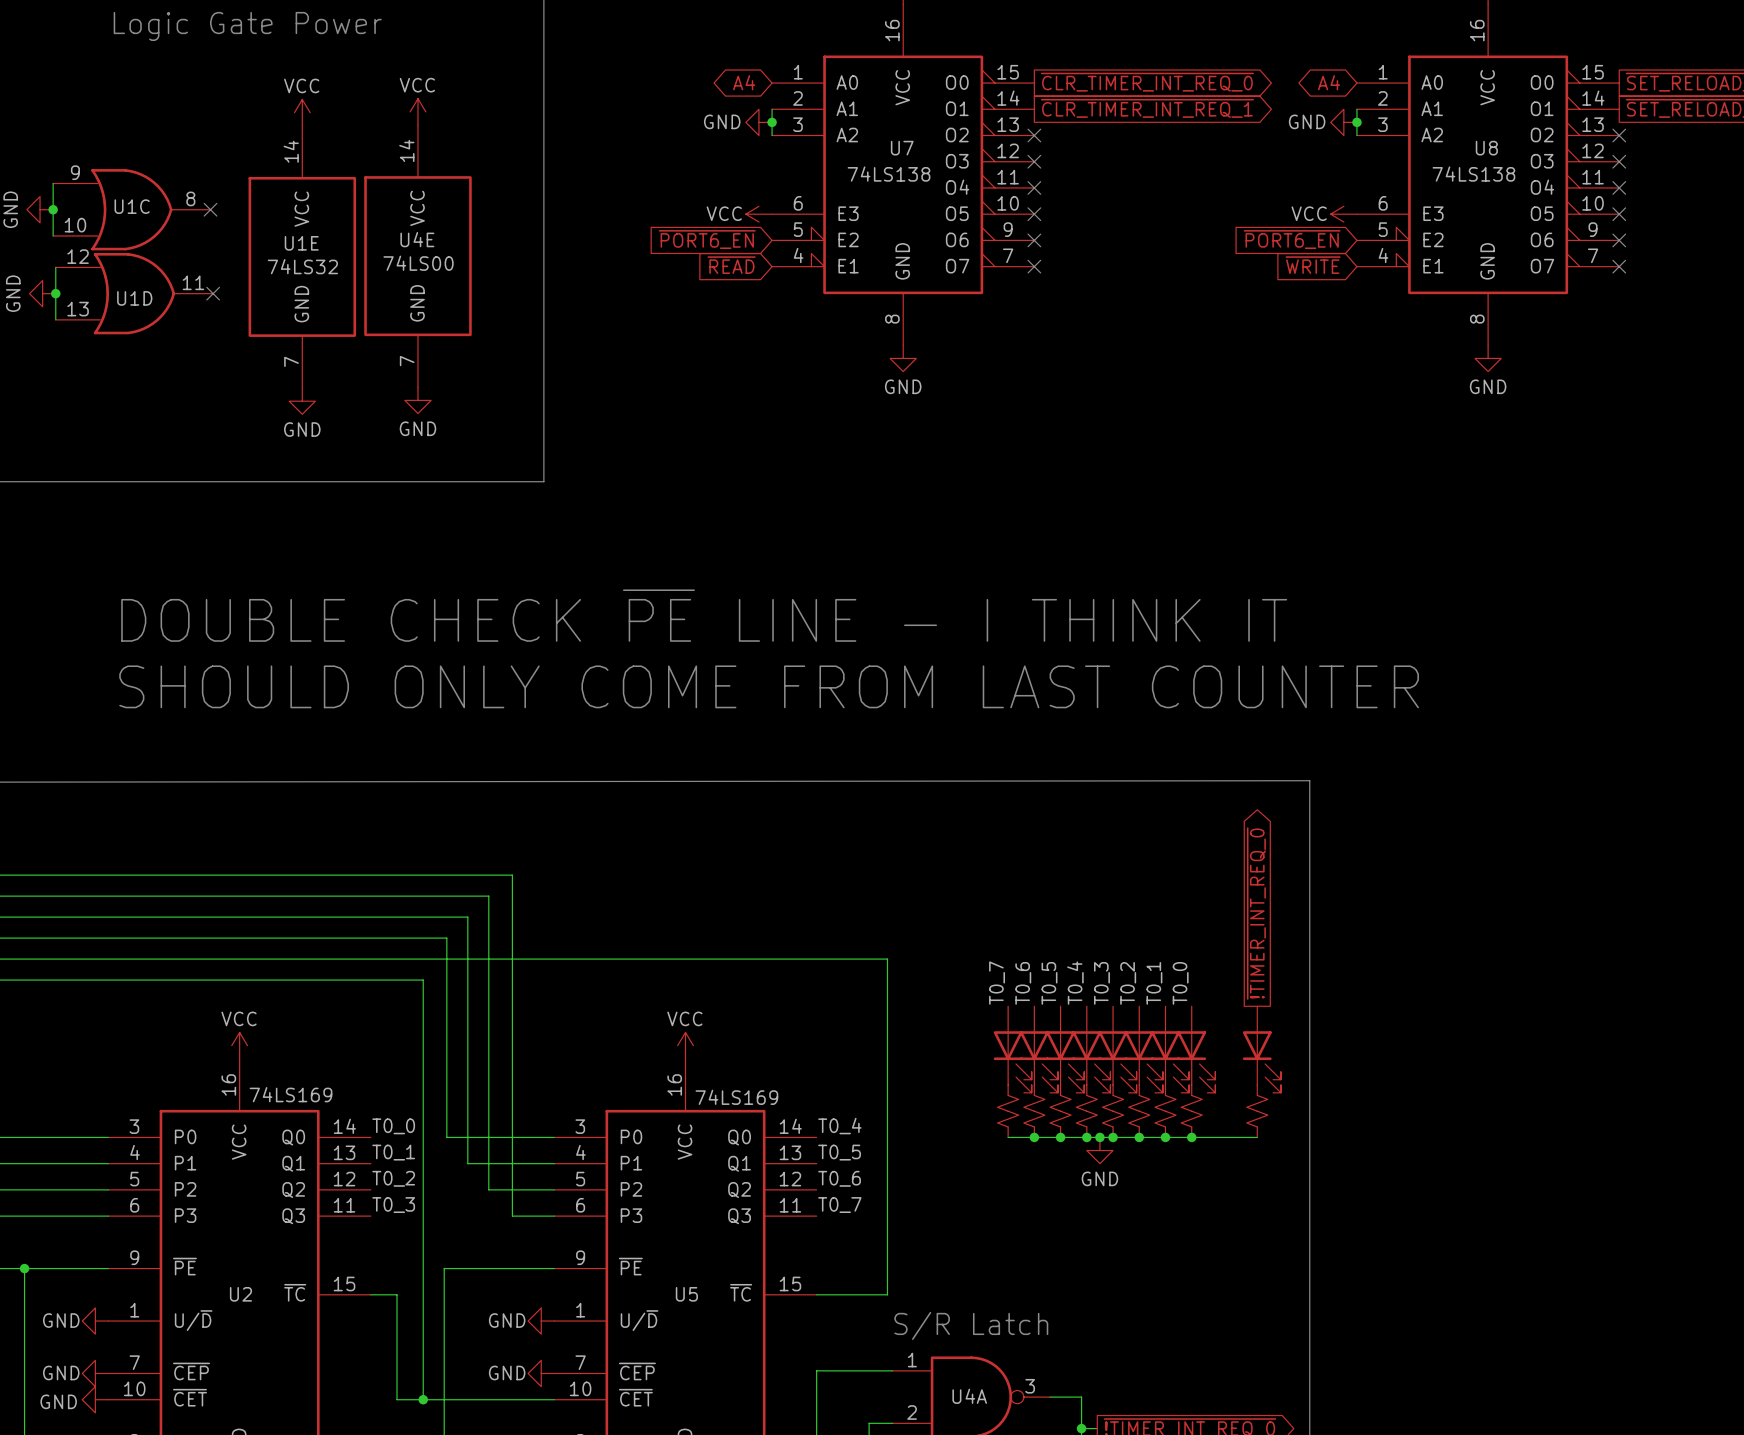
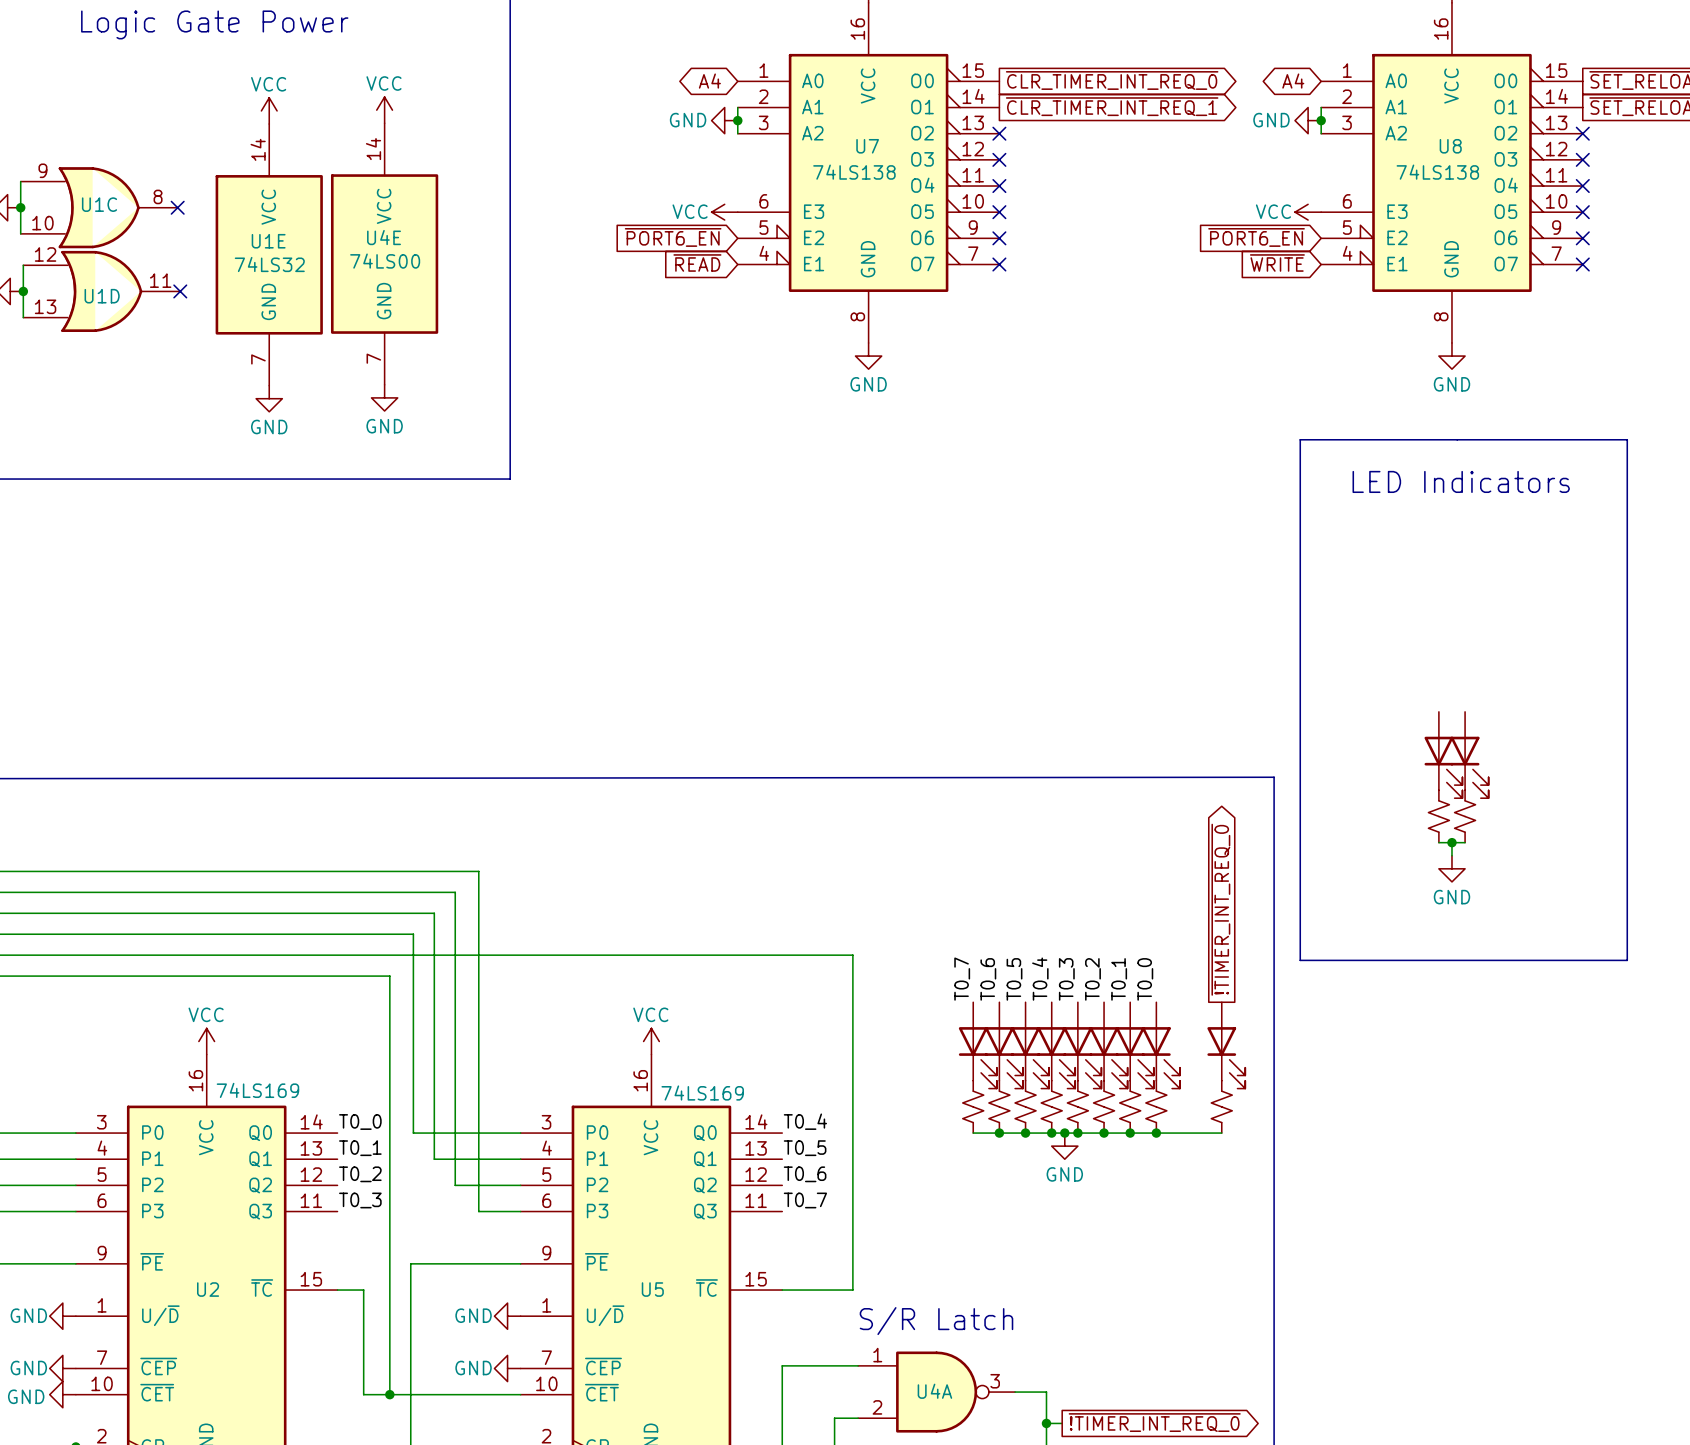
line: none -> (1300, 439) (1300, 960) (1627, 960) (1627, 439) (1300, 439)
text: none -> LED Indicators (1461, 481)
text: DOUBLE CHECK ~{PE} LINE - I THINK IT (704, 615) -> none
text: SHOULD ONLY COME FROM LAST COUNTER (769, 686) -> none
part: none -> (1443, 755)
part: none -> (1469, 755)
part: none -> (1438, 816)
part: none -> (1465, 816)
wire: none -> (1438, 842) (1465, 842)
wire: none -> (1451, 842) (1451, 855)
junction: none -> (1451, 842)
power symbol: none -> GND (1451, 868)

